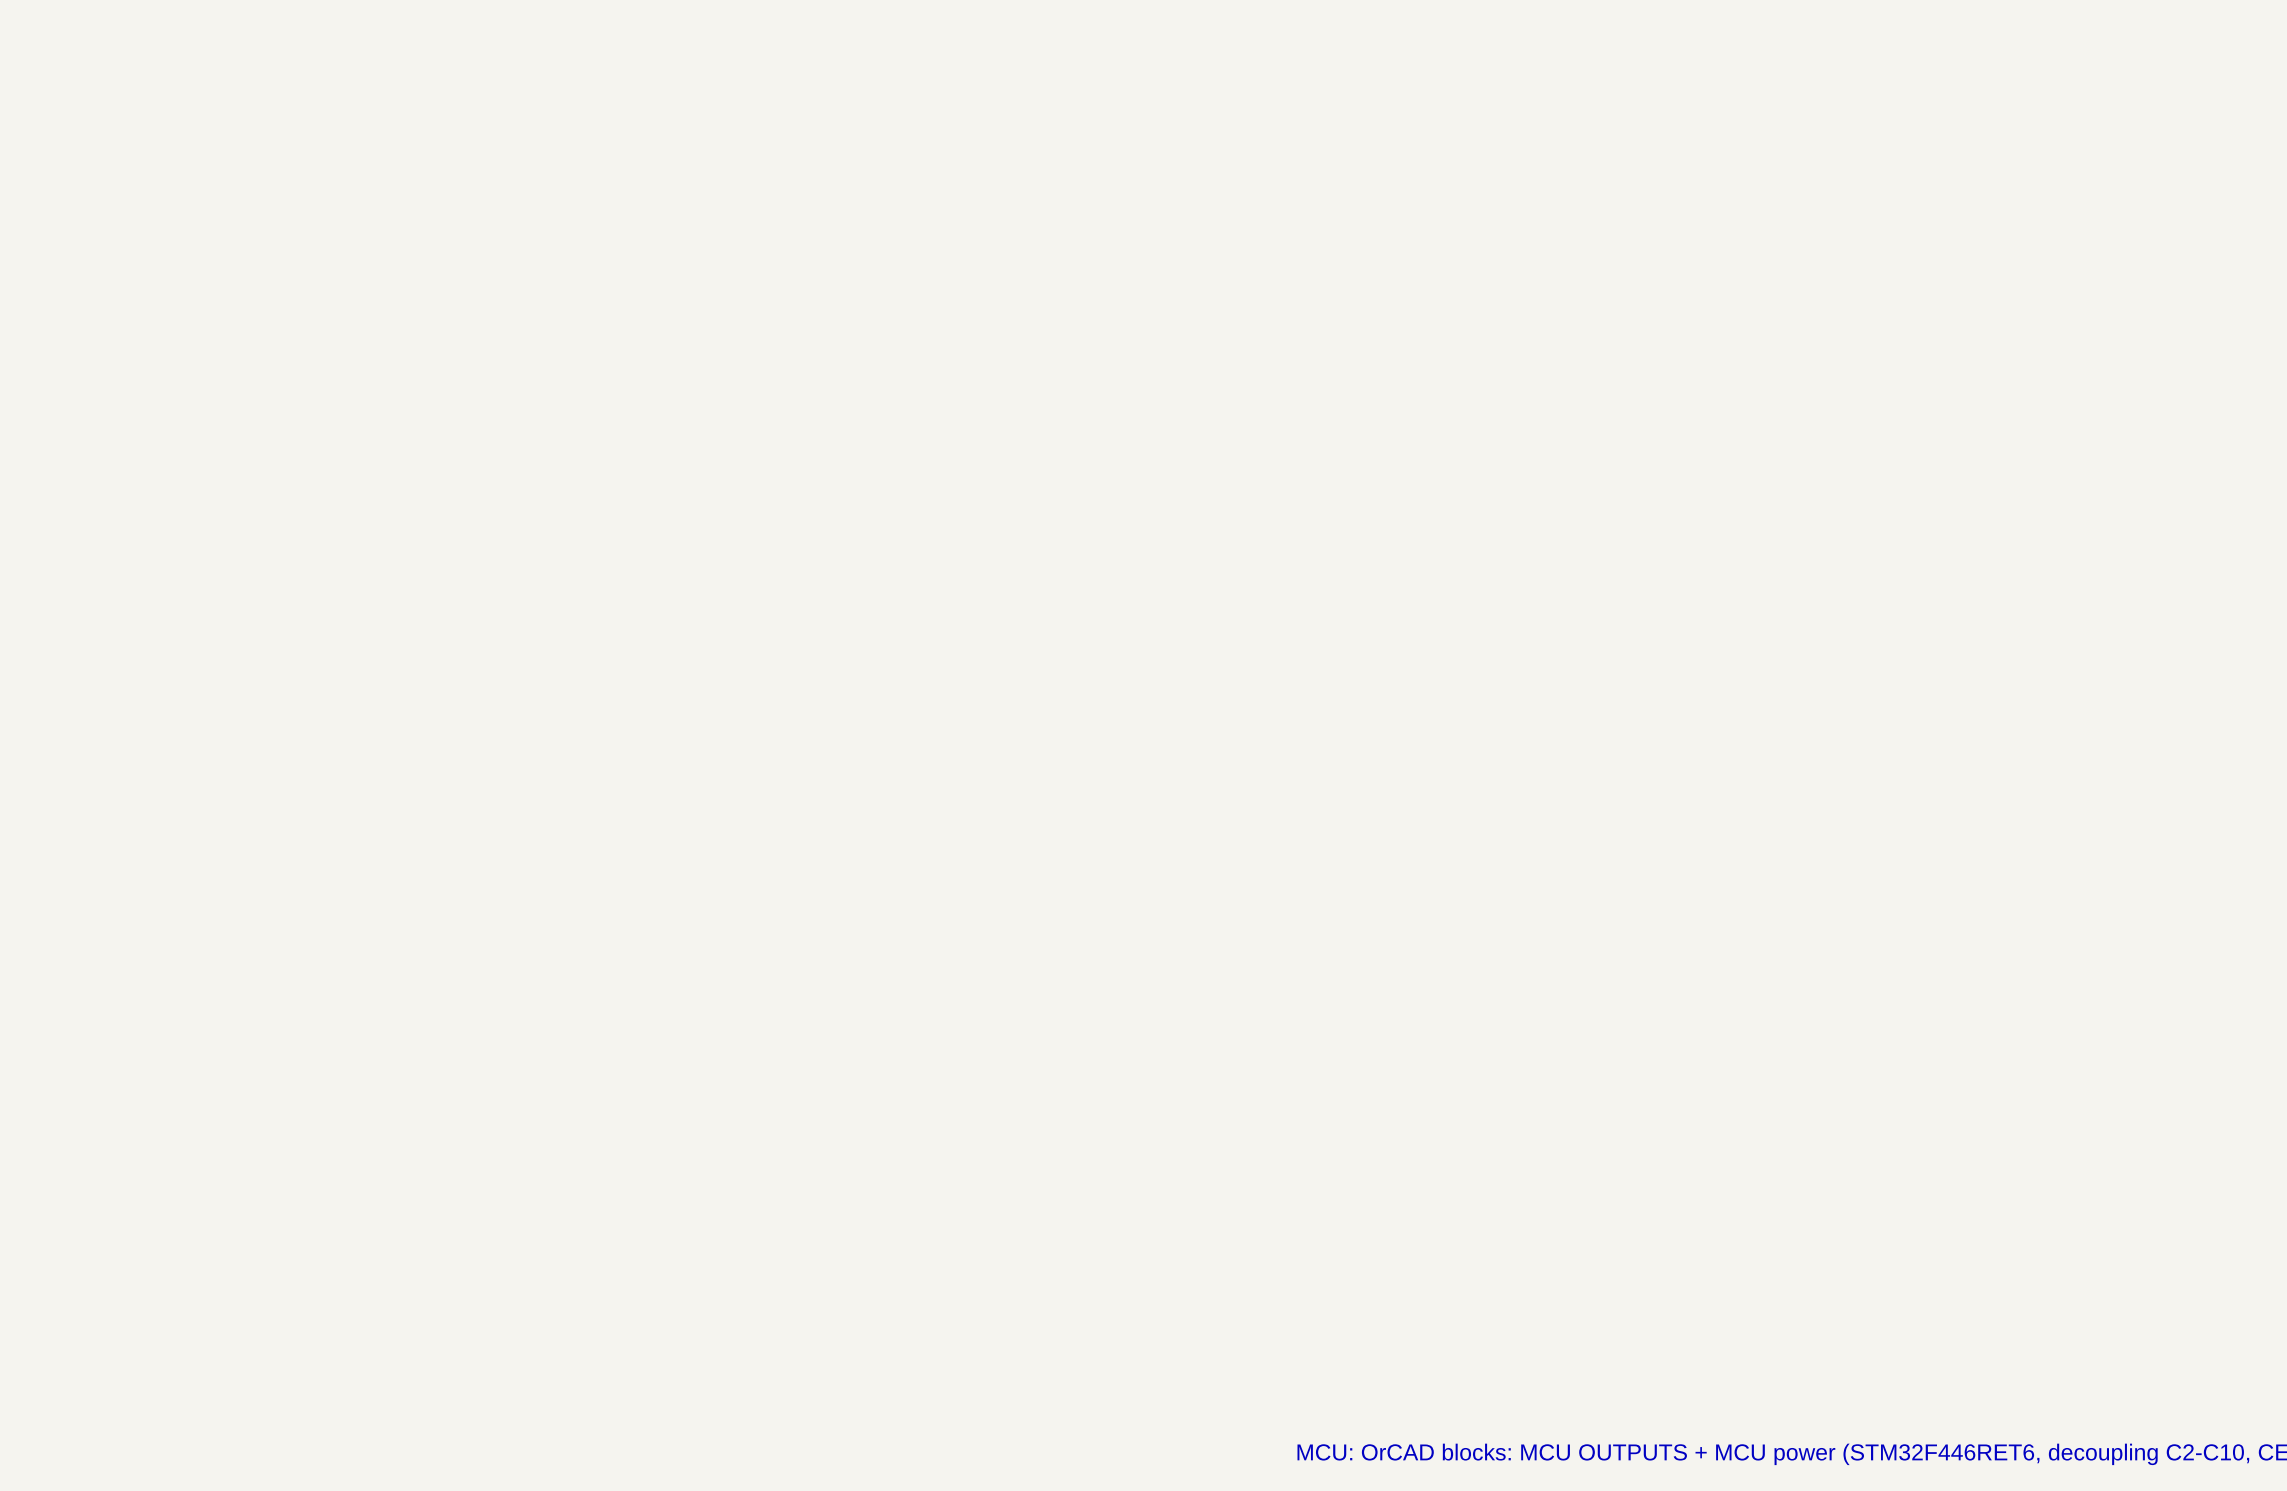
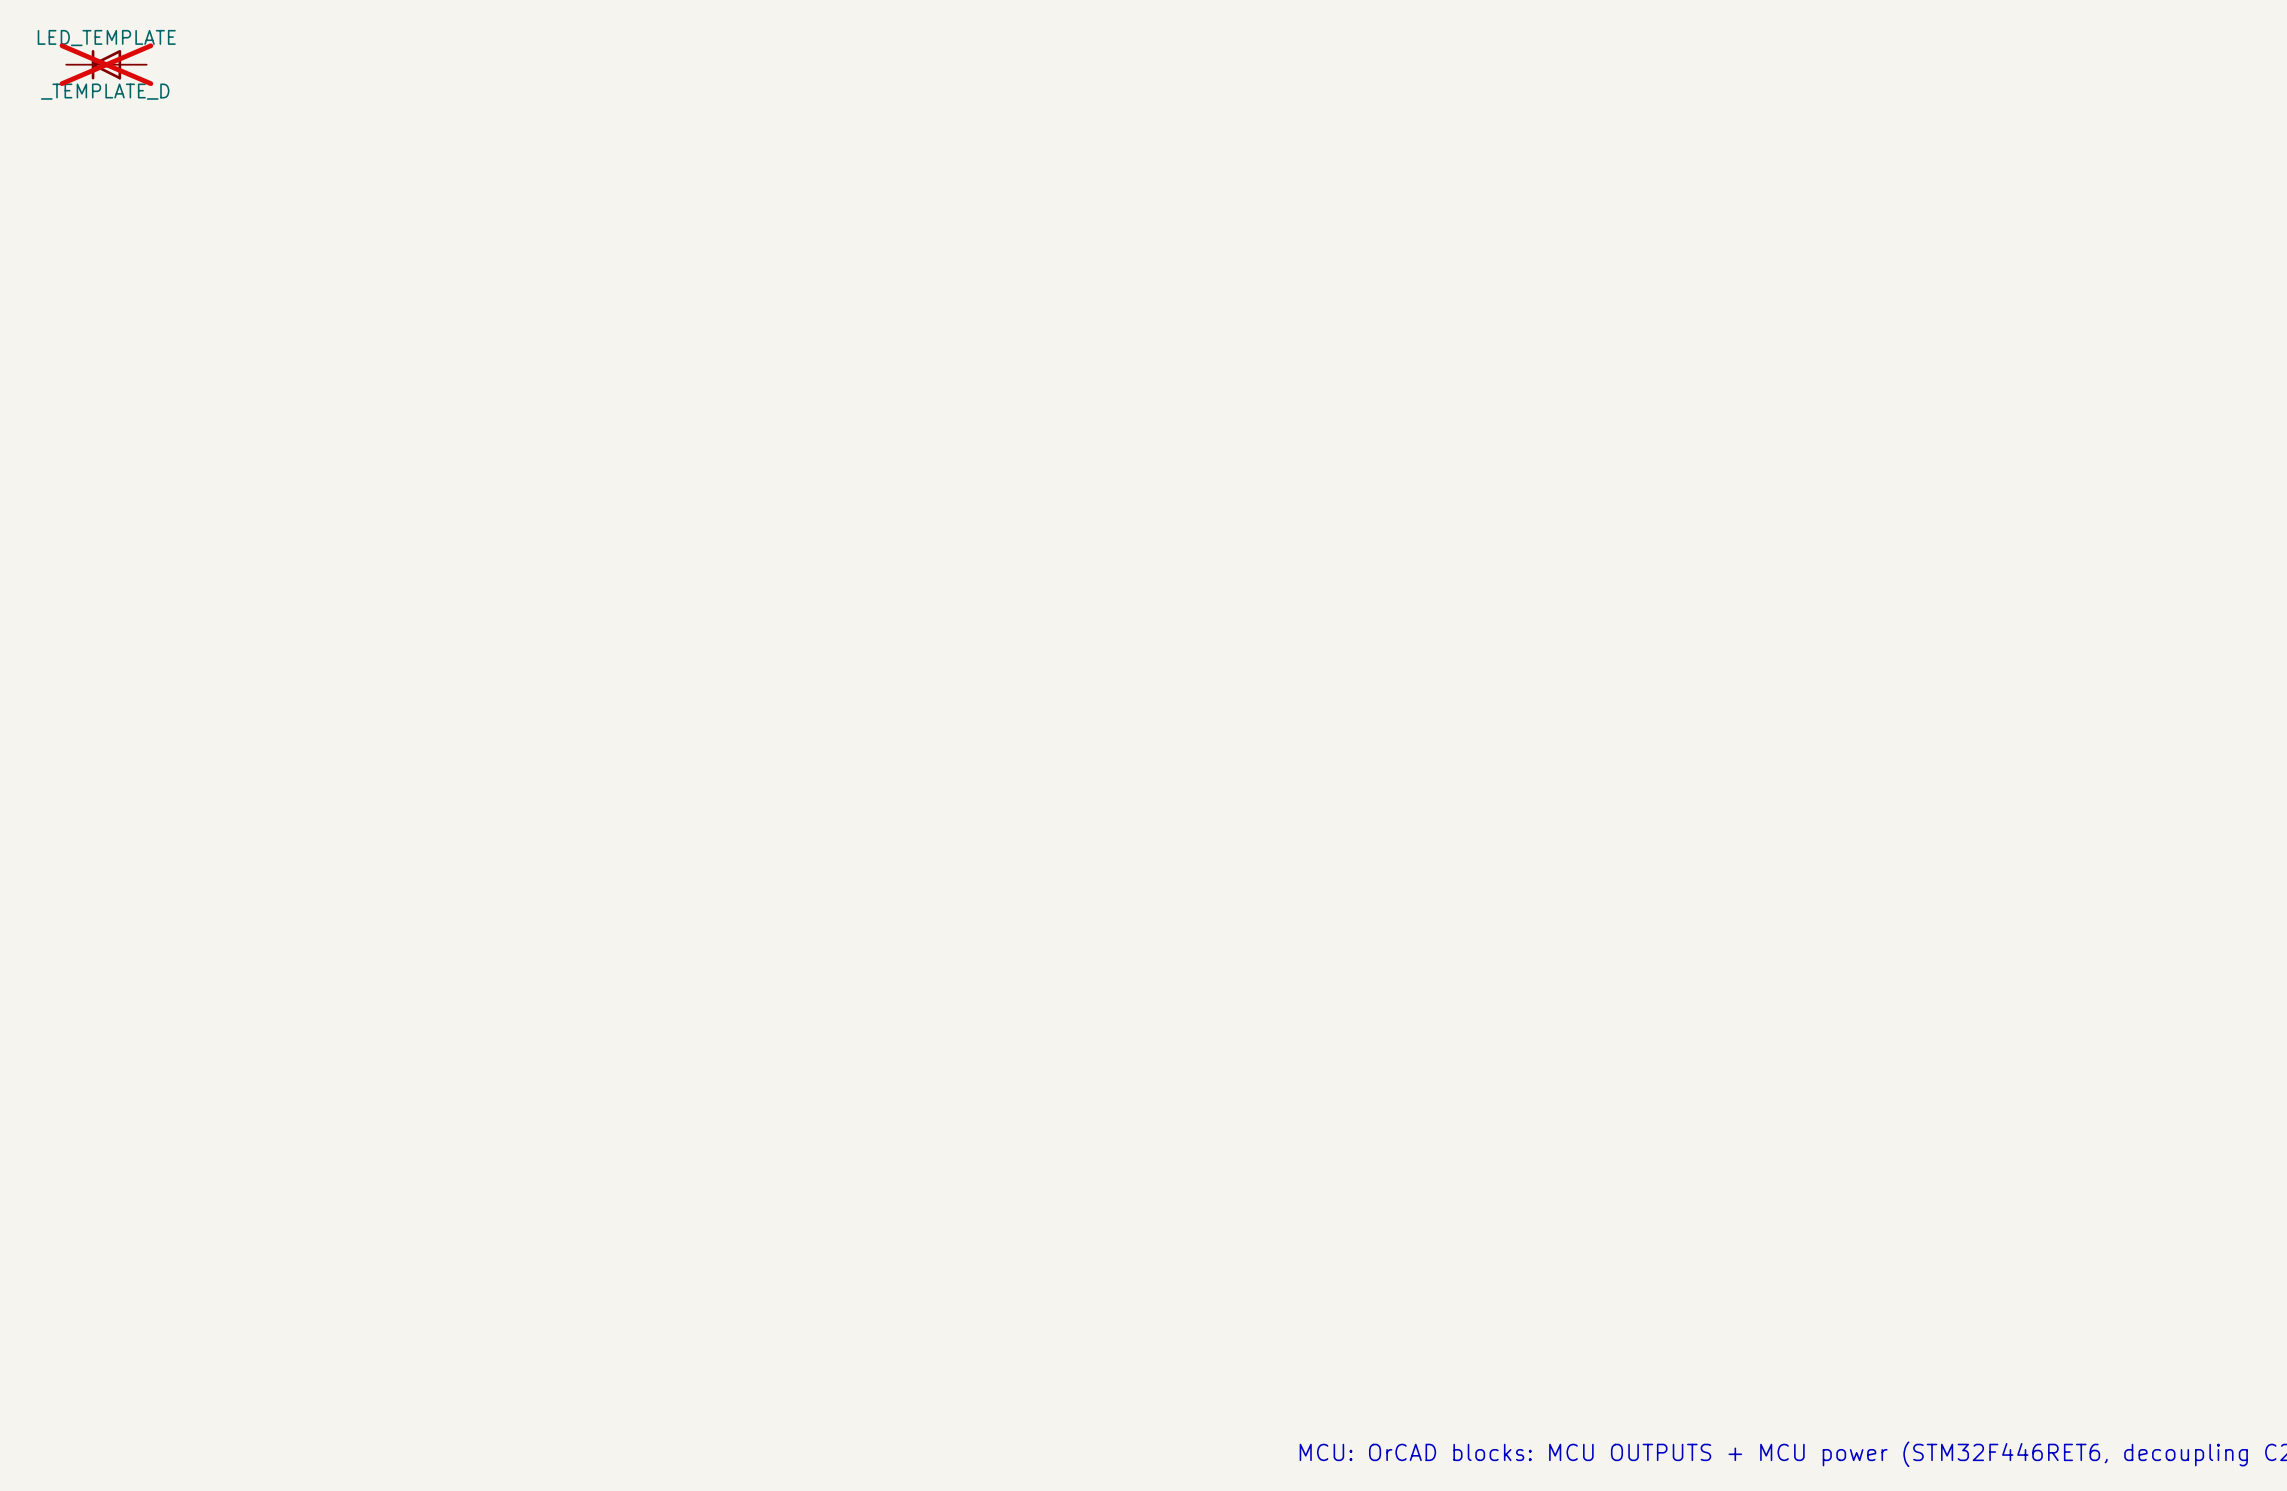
_TEMPLATE_D: none -> LED_TEMPLATE (106, 64)

